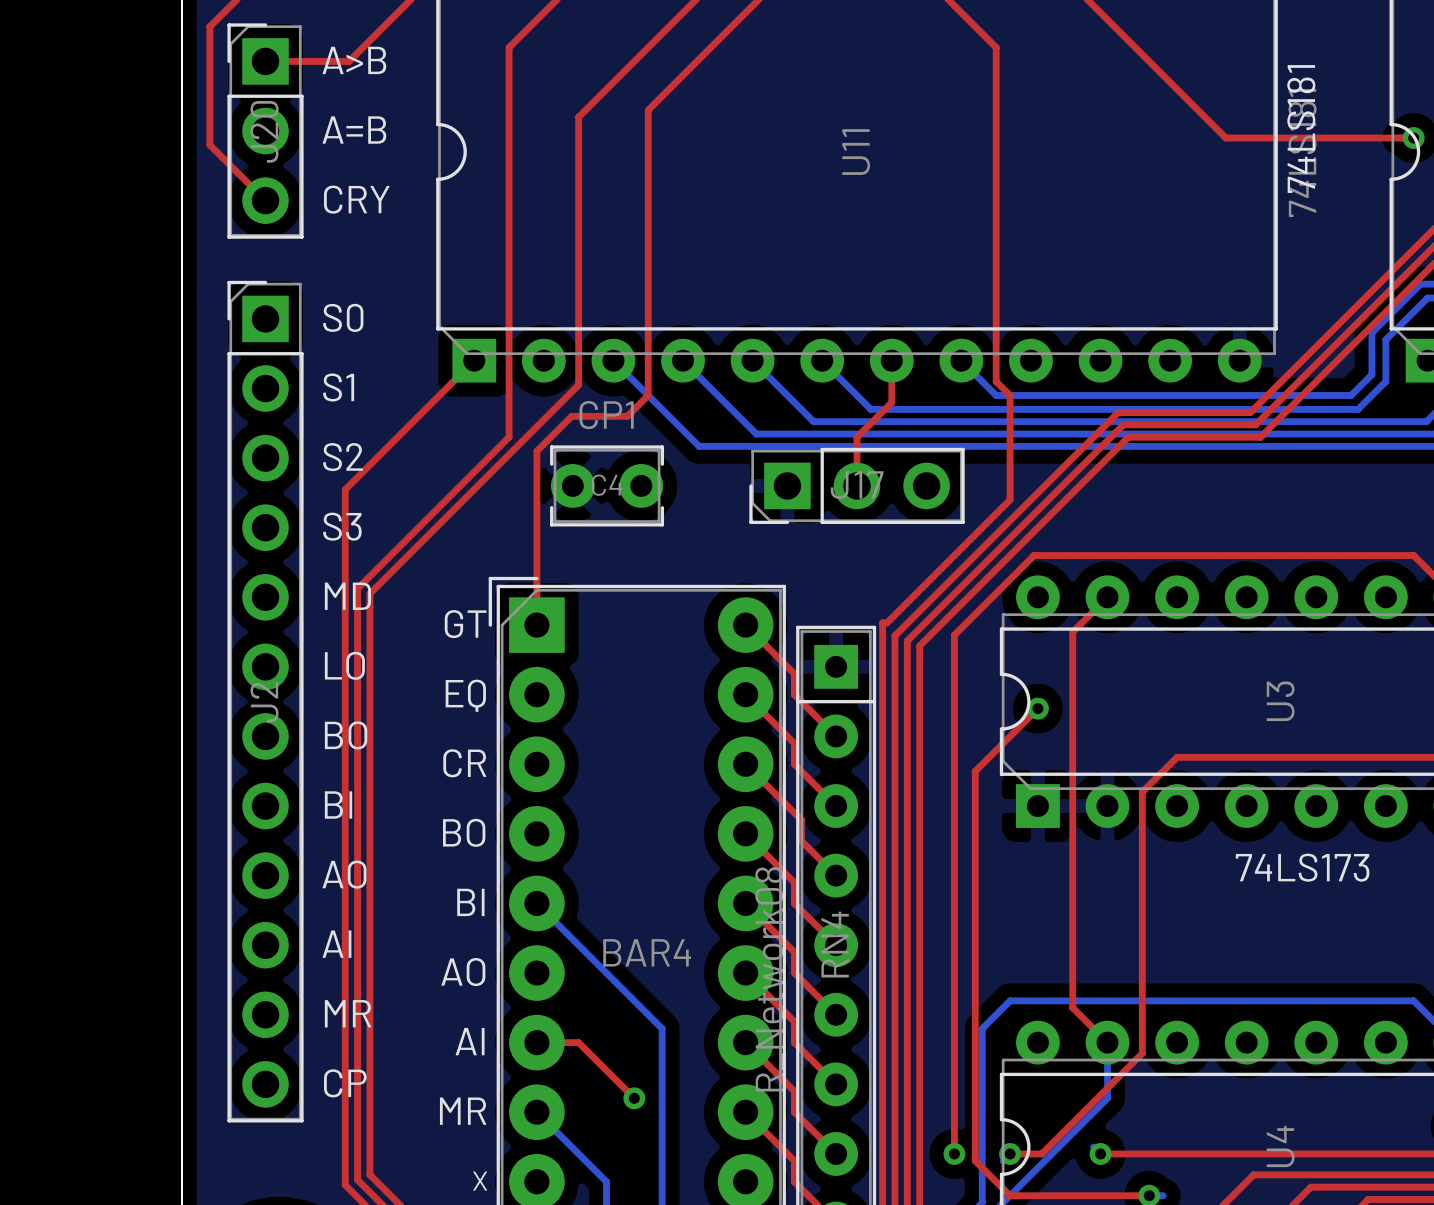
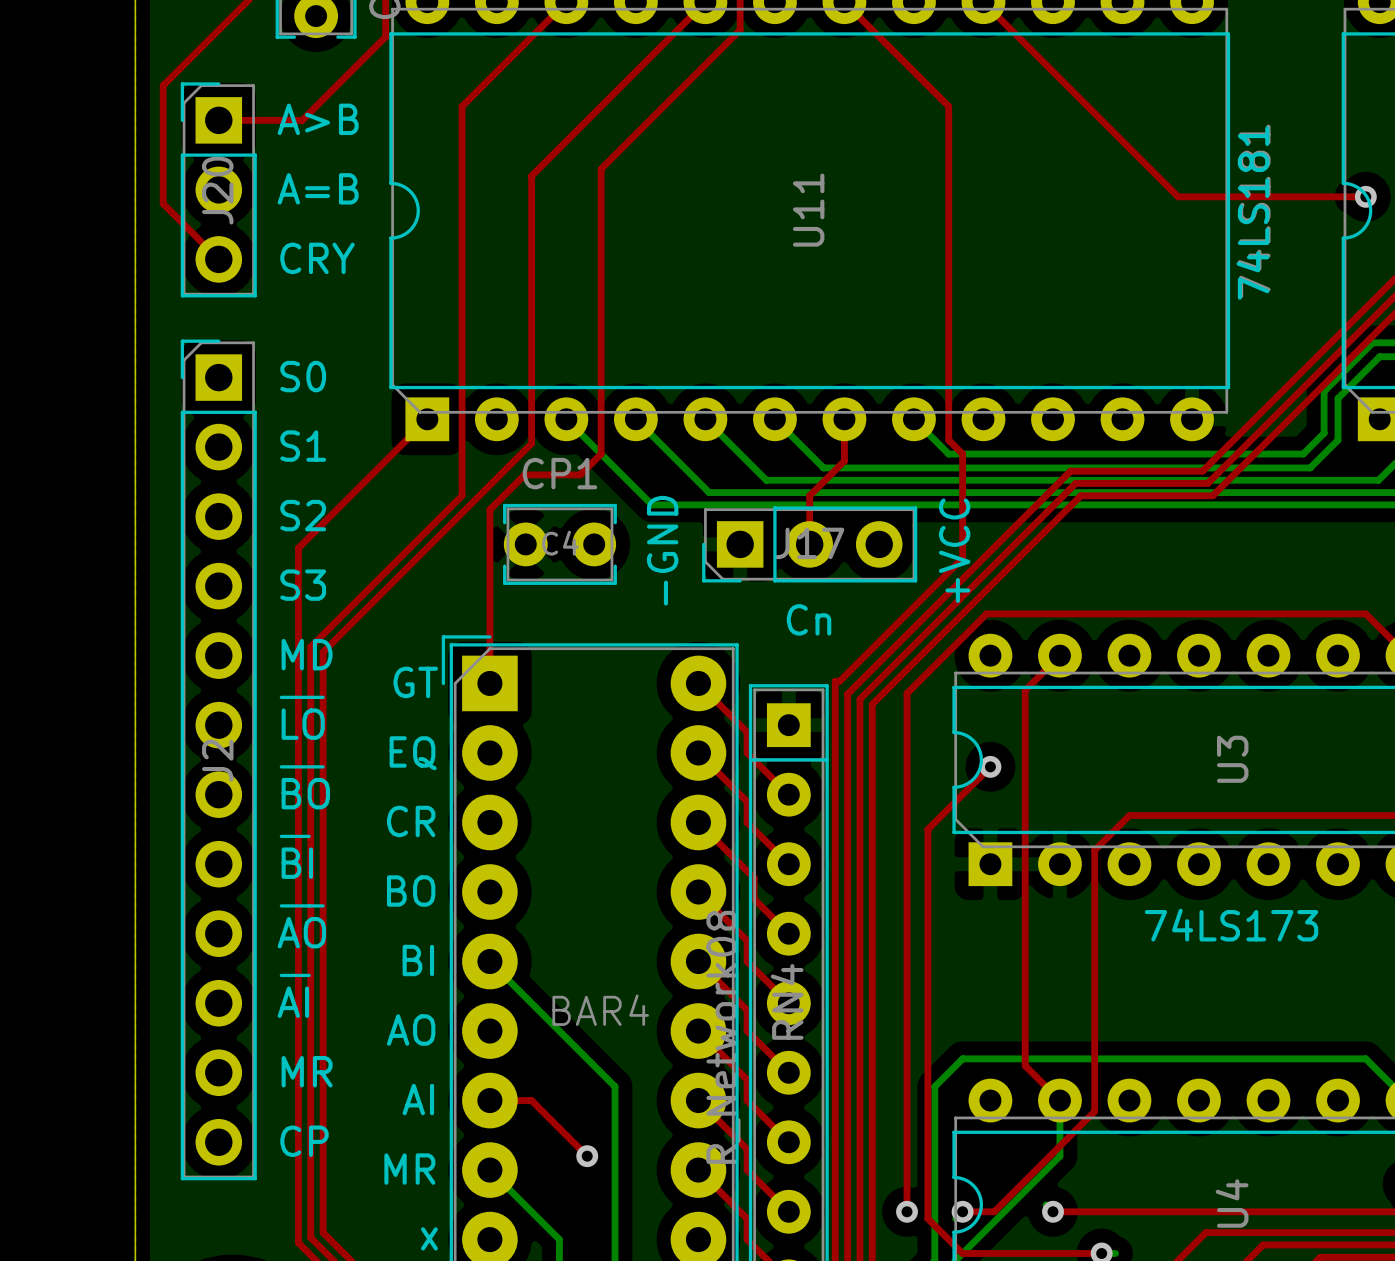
text: none -> -GND (662, 550)
text: none -> +VCC (954, 550)
text: none -> Cn (809, 619)
line: none -> (281, 697) (323, 697)
line: none -> (281, 766) (323, 766)
line: none -> (281, 836) (309, 836)
line: none -> (281, 905) (323, 905)
line: none -> (281, 975) (309, 975)

